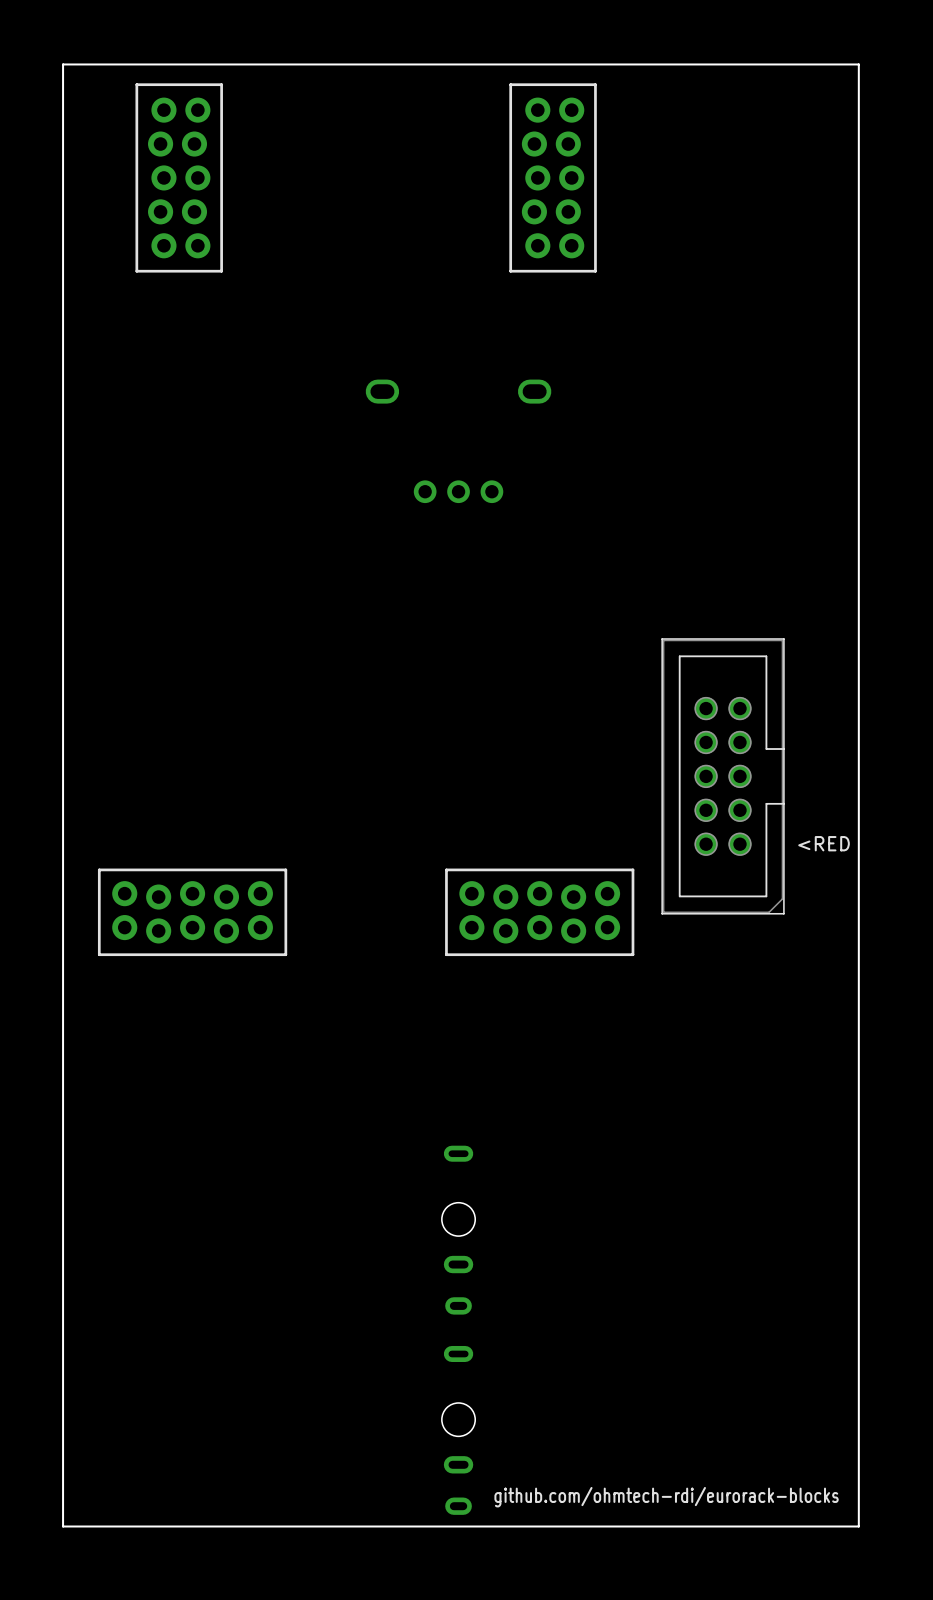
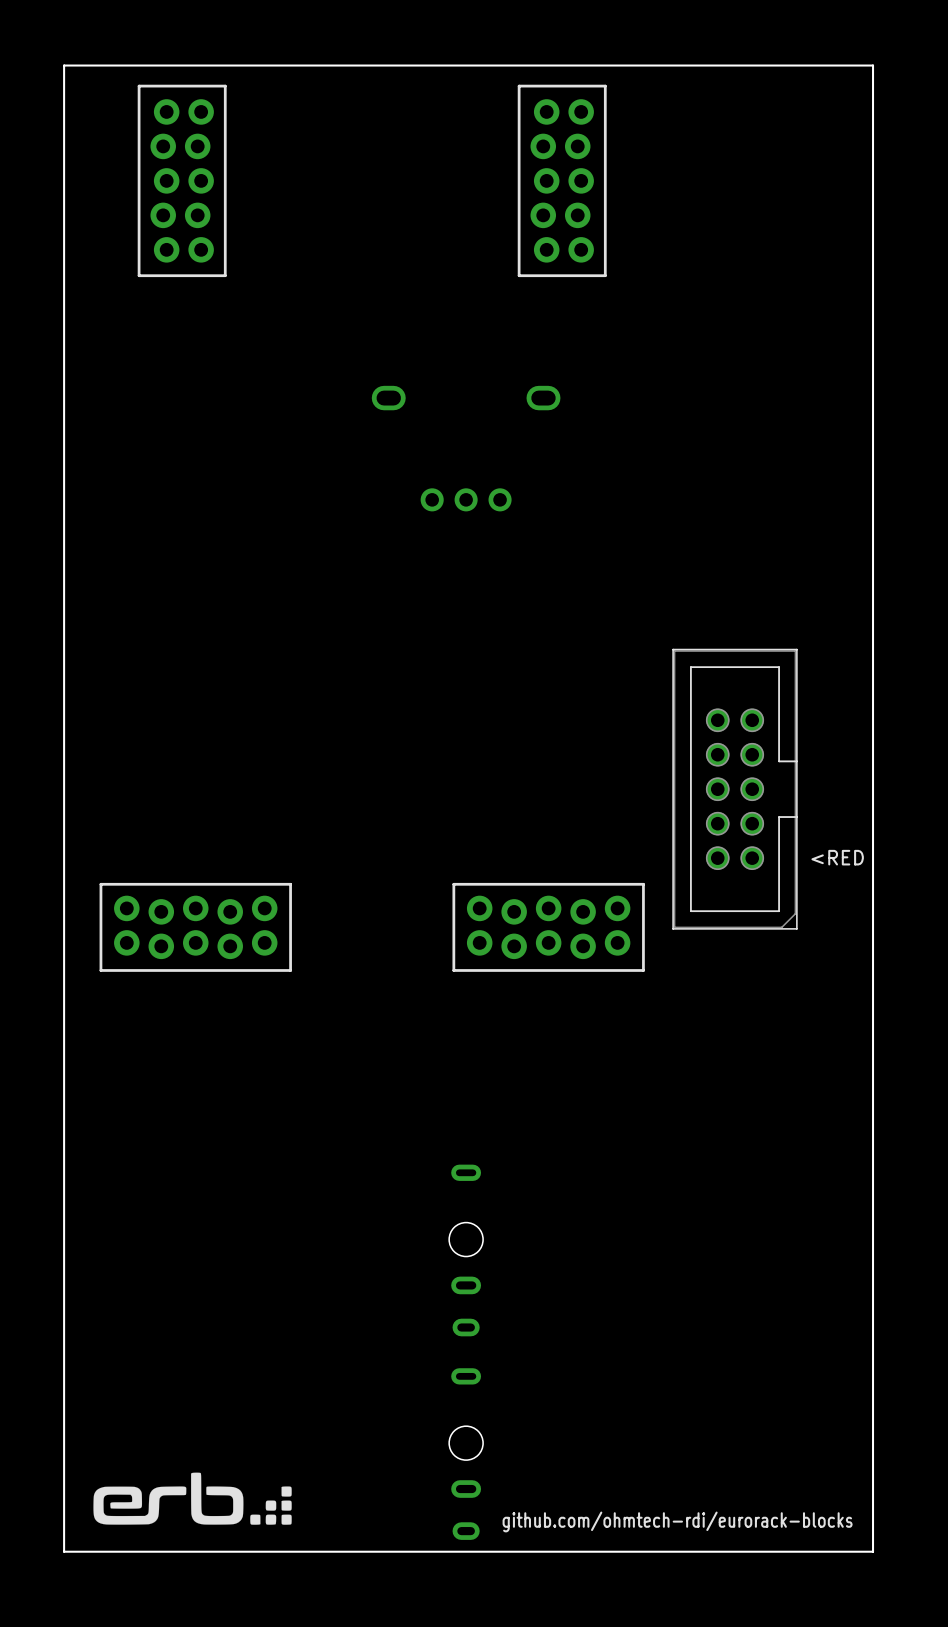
drawing: none -> [93, 1472, 292, 1525]

